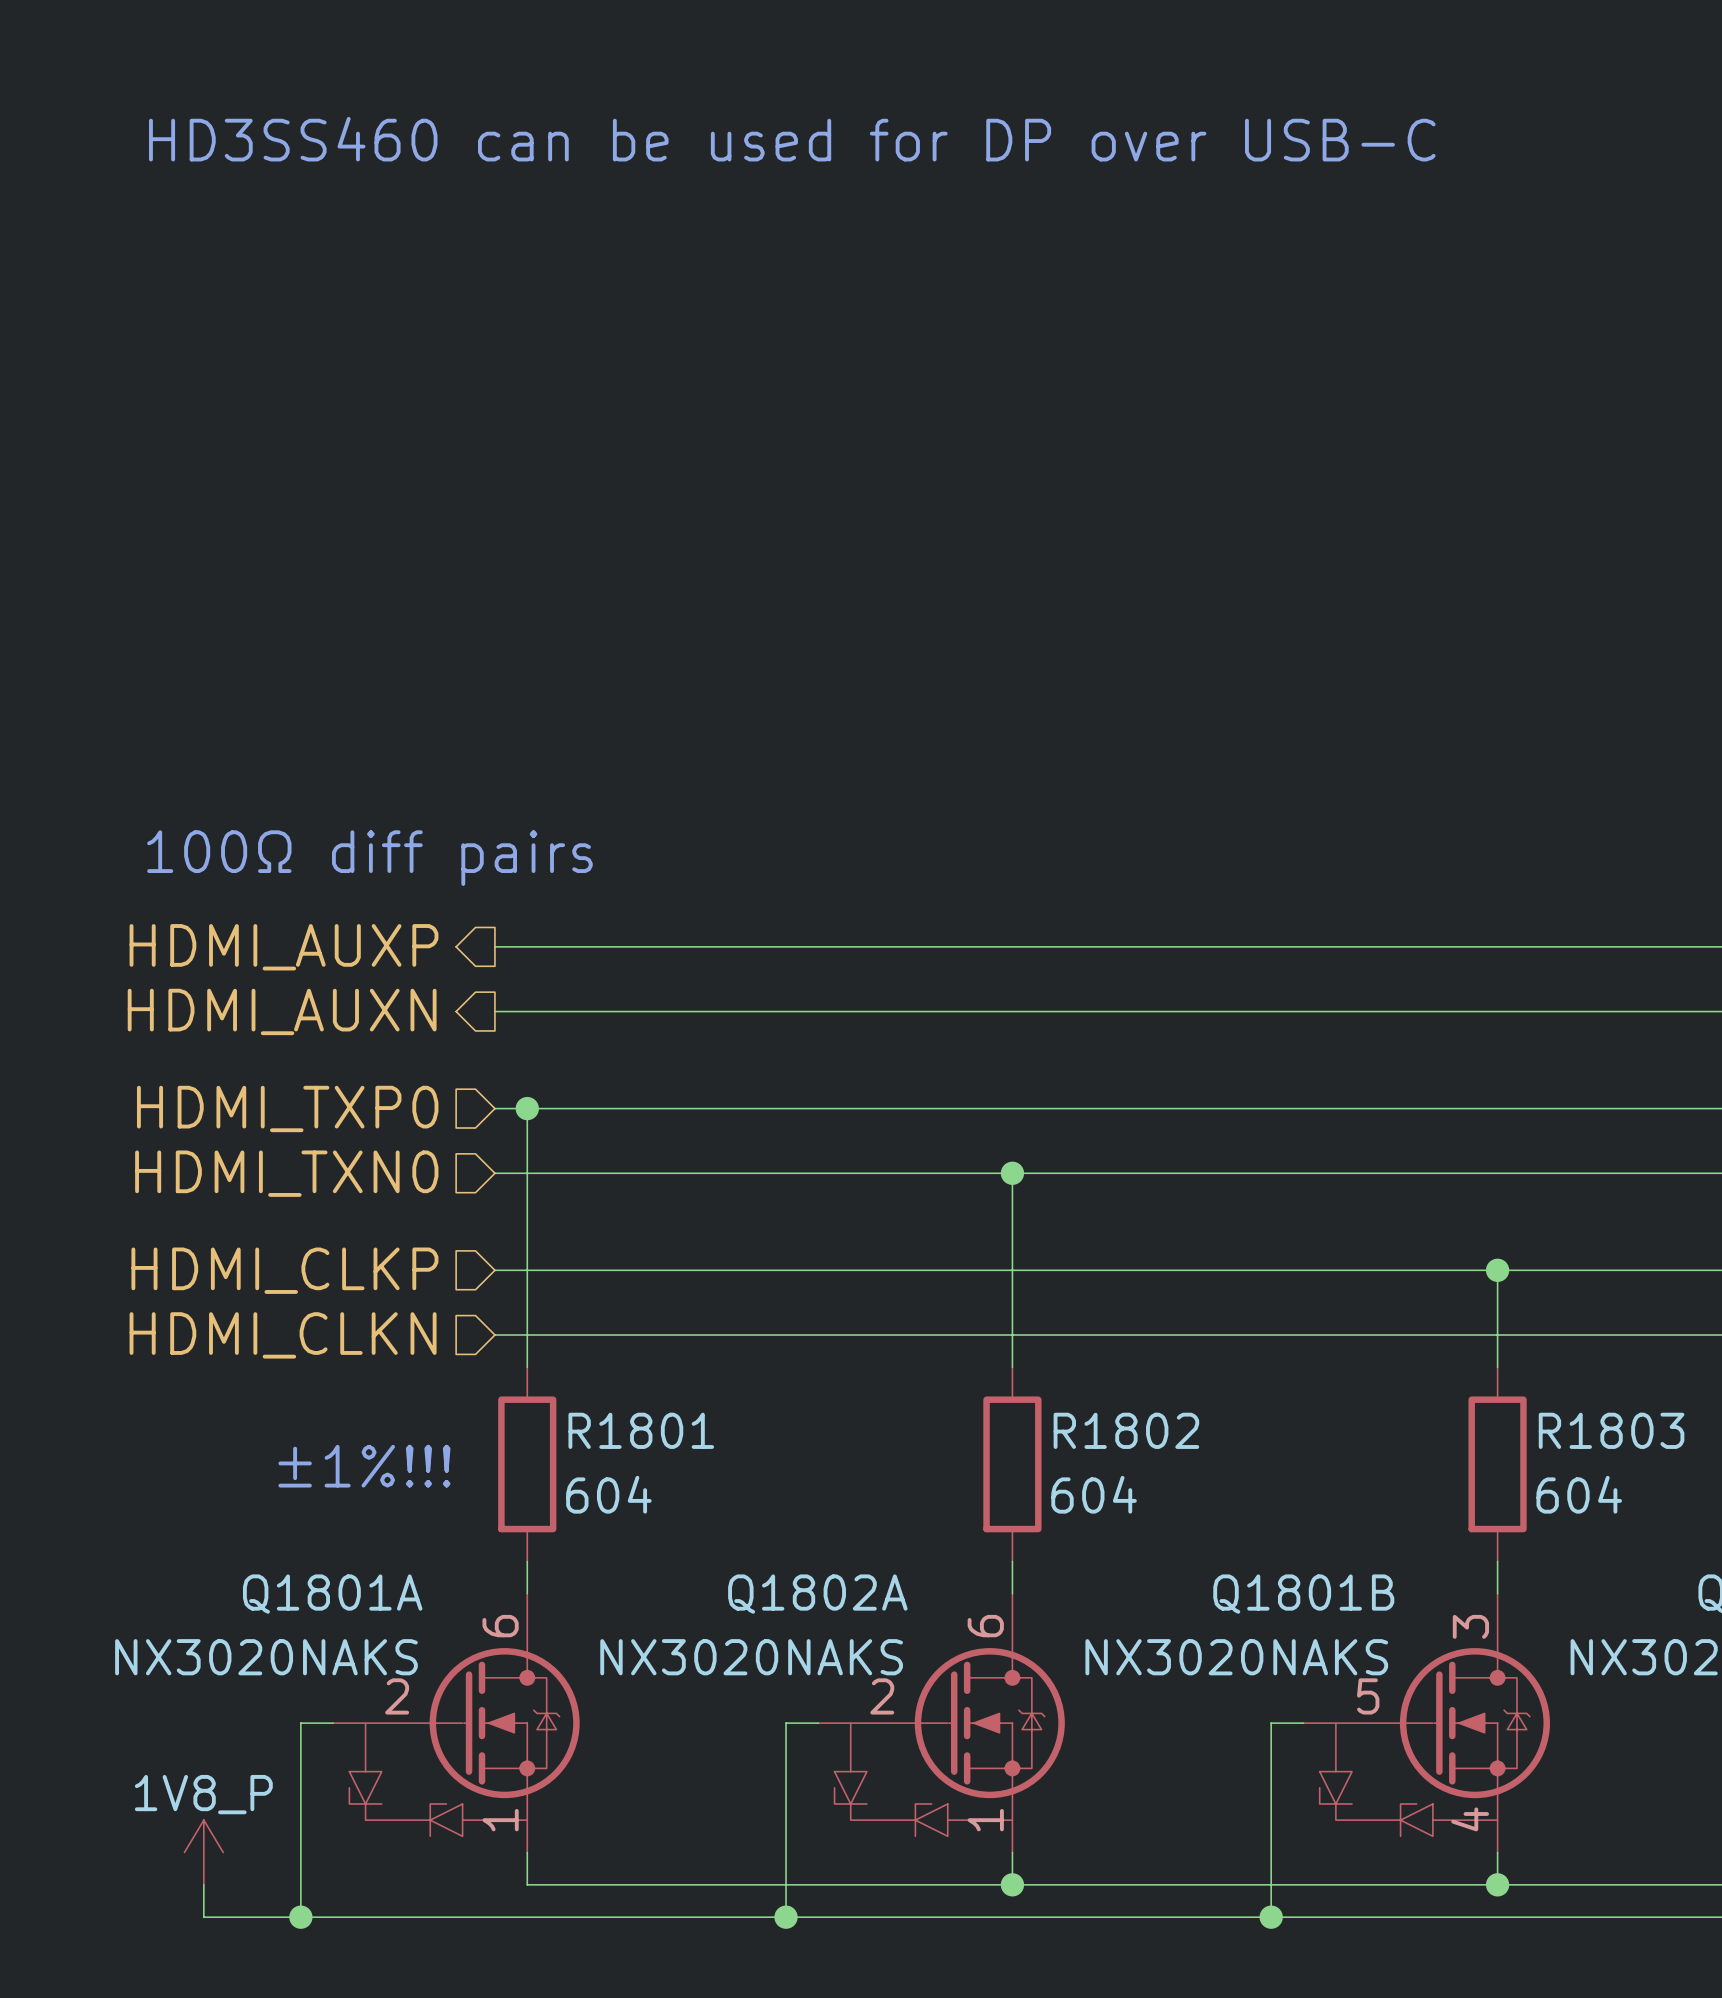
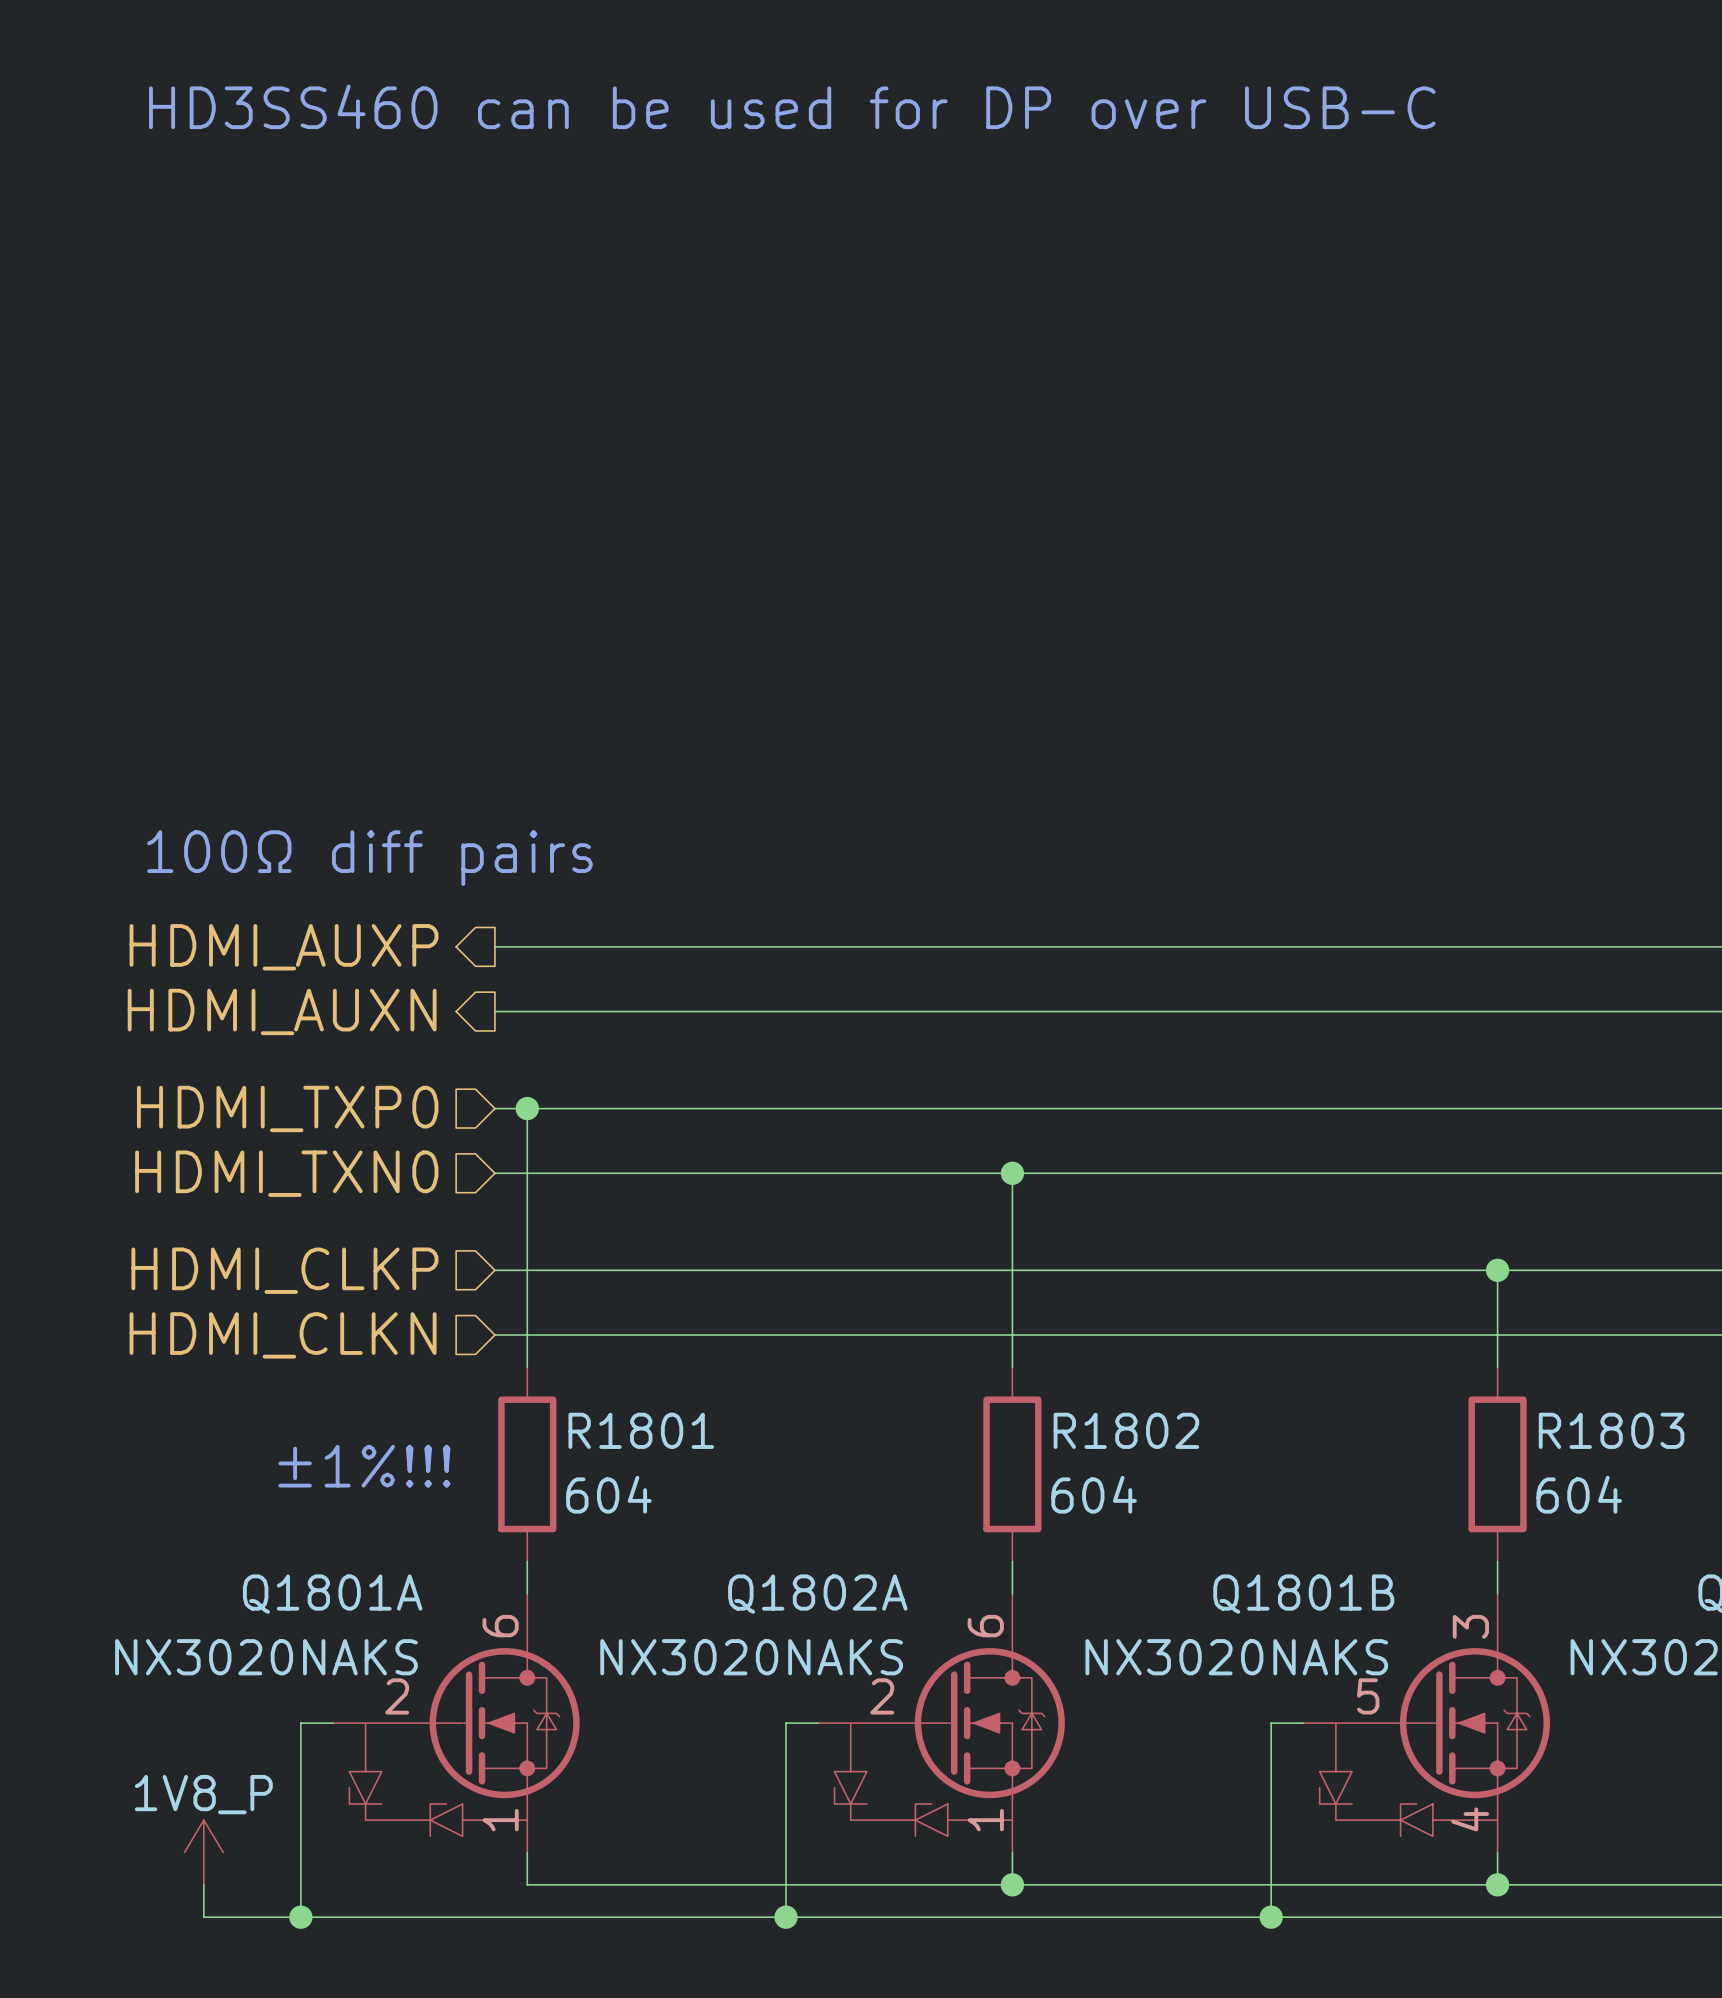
text position: HD3SS460 can be used for DP over USB-C (792, 139) -> HD3SS460 can be used for DP over USB-C (792, 106)

